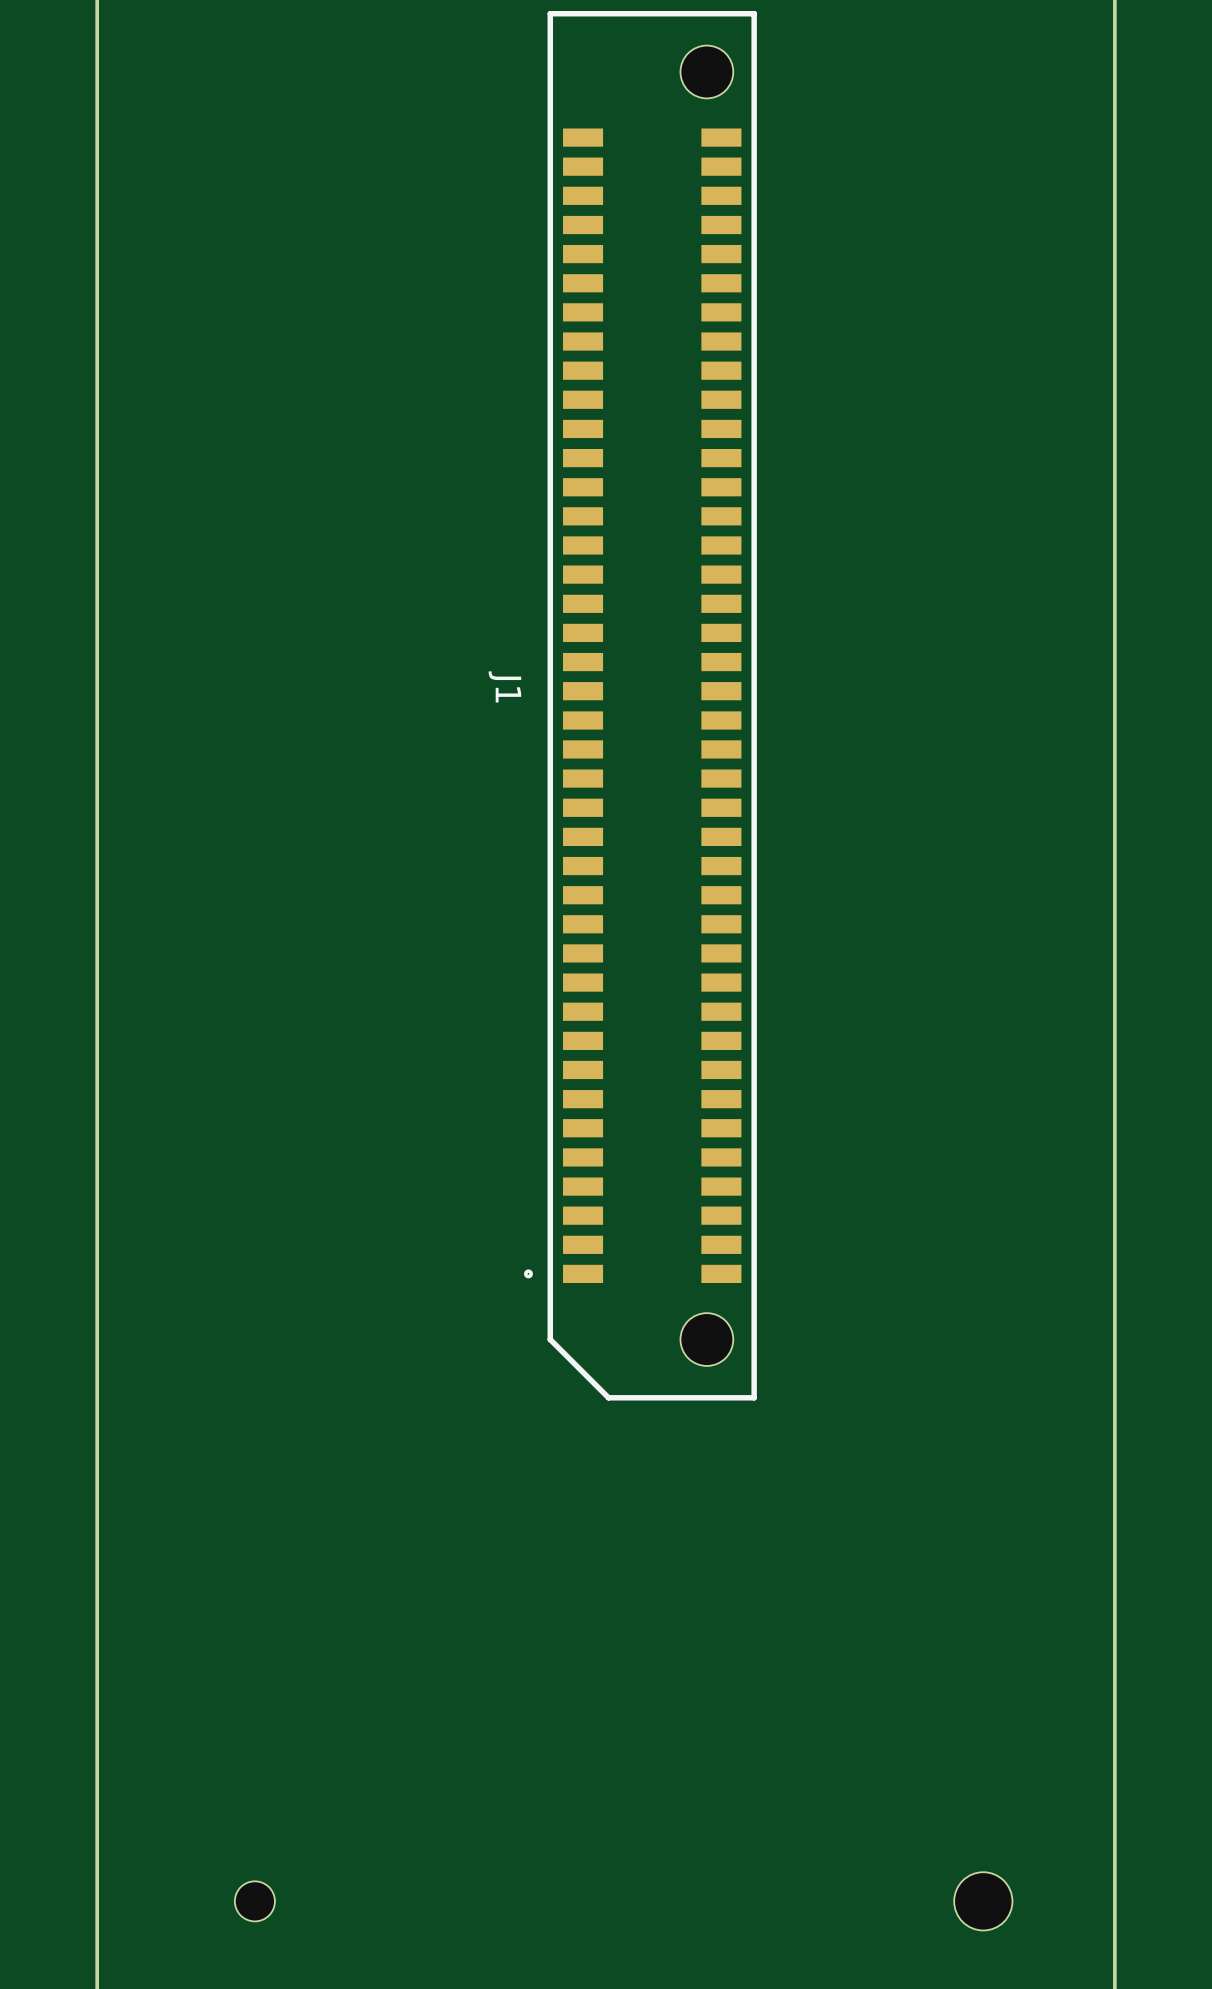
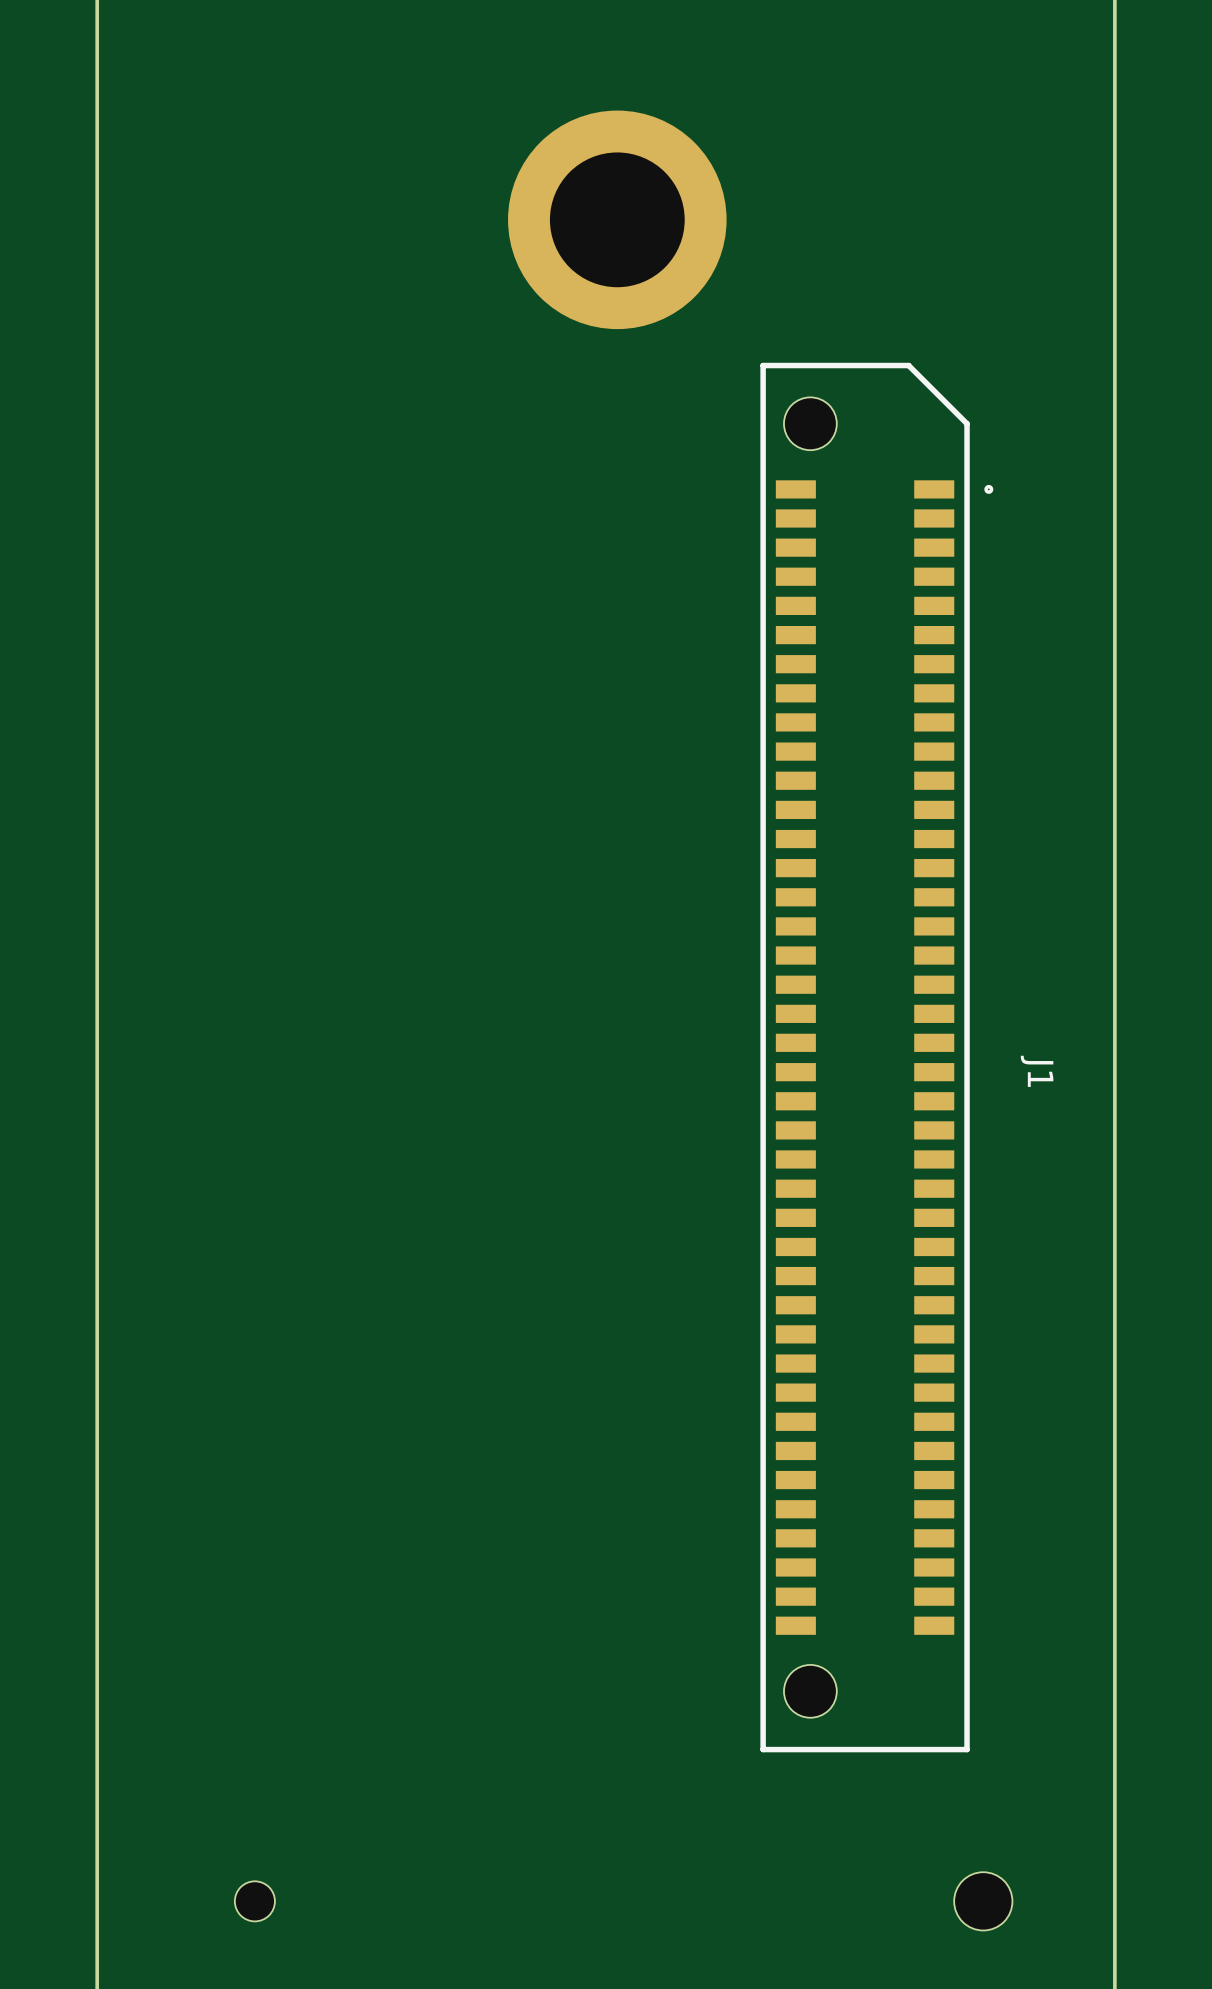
part: none -> (617, 219)
J1 rotation: 0° (640, 705) -> 180° (876, 1057)

